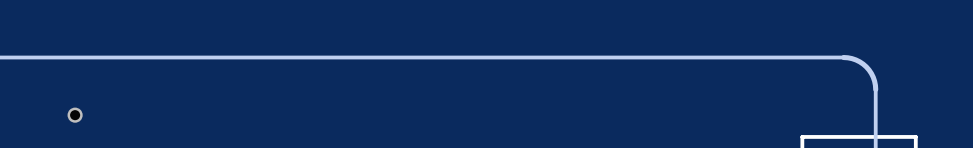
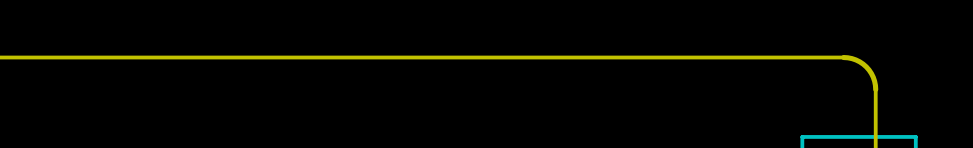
via: (75, 115) -> none

